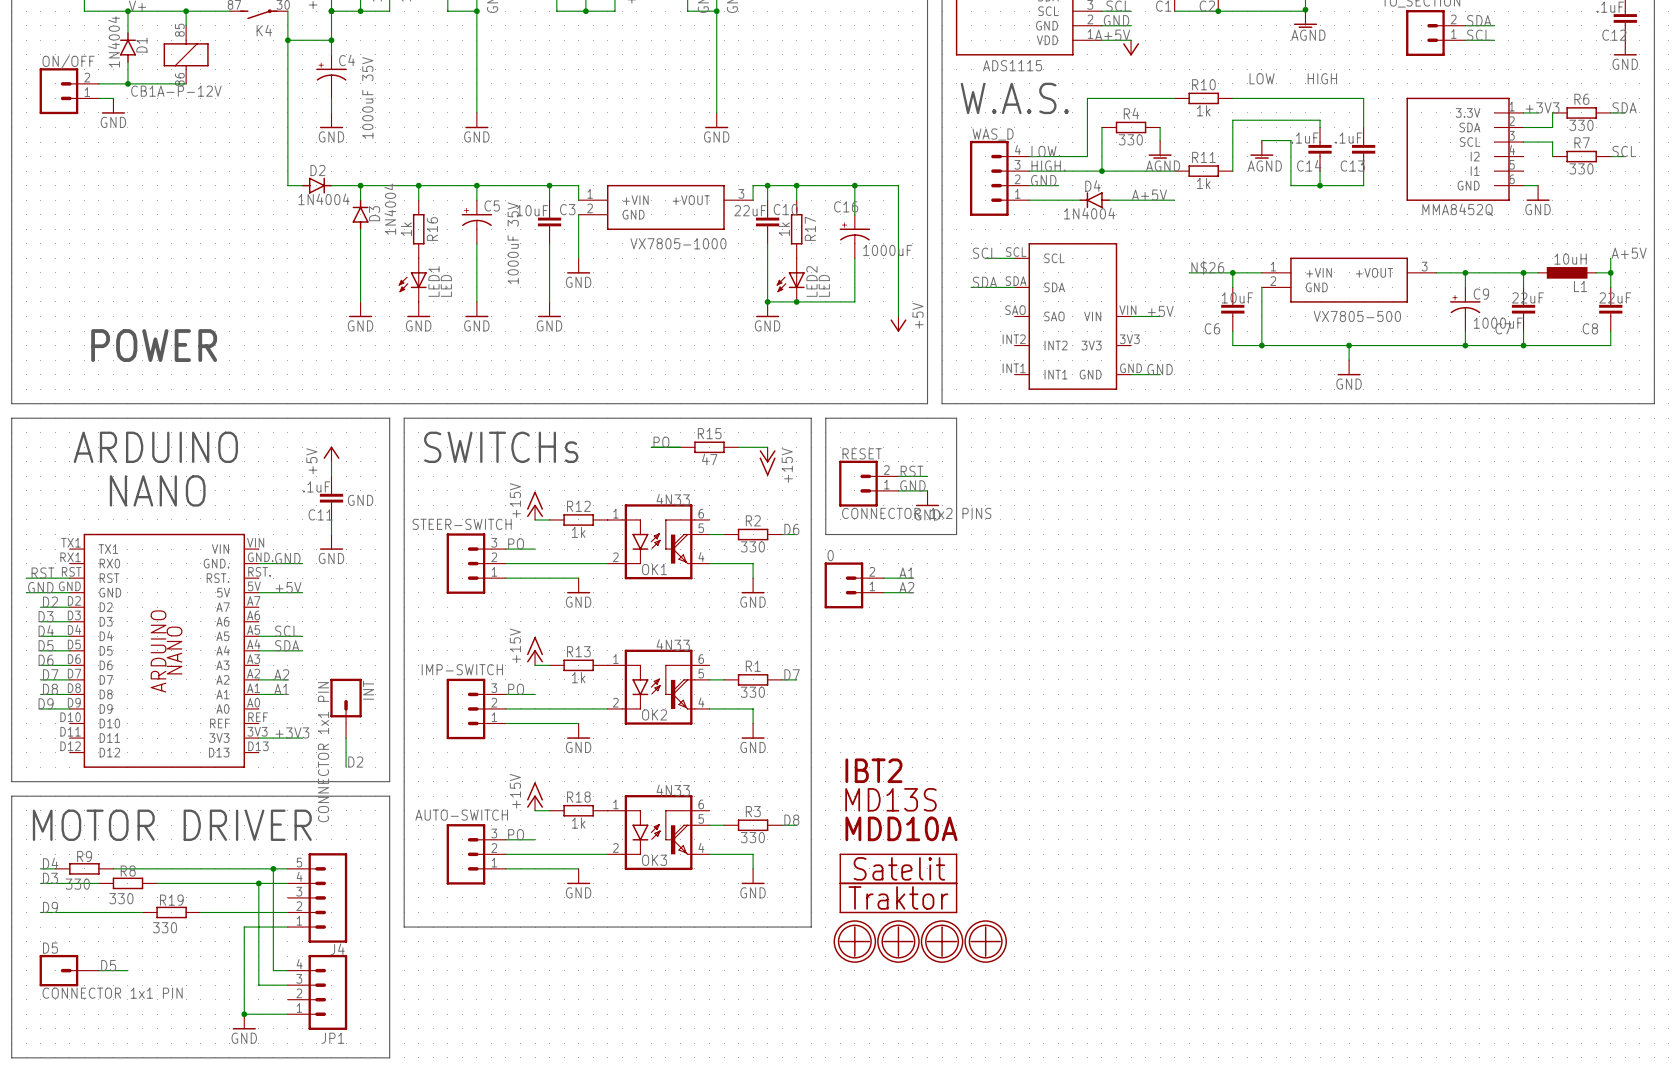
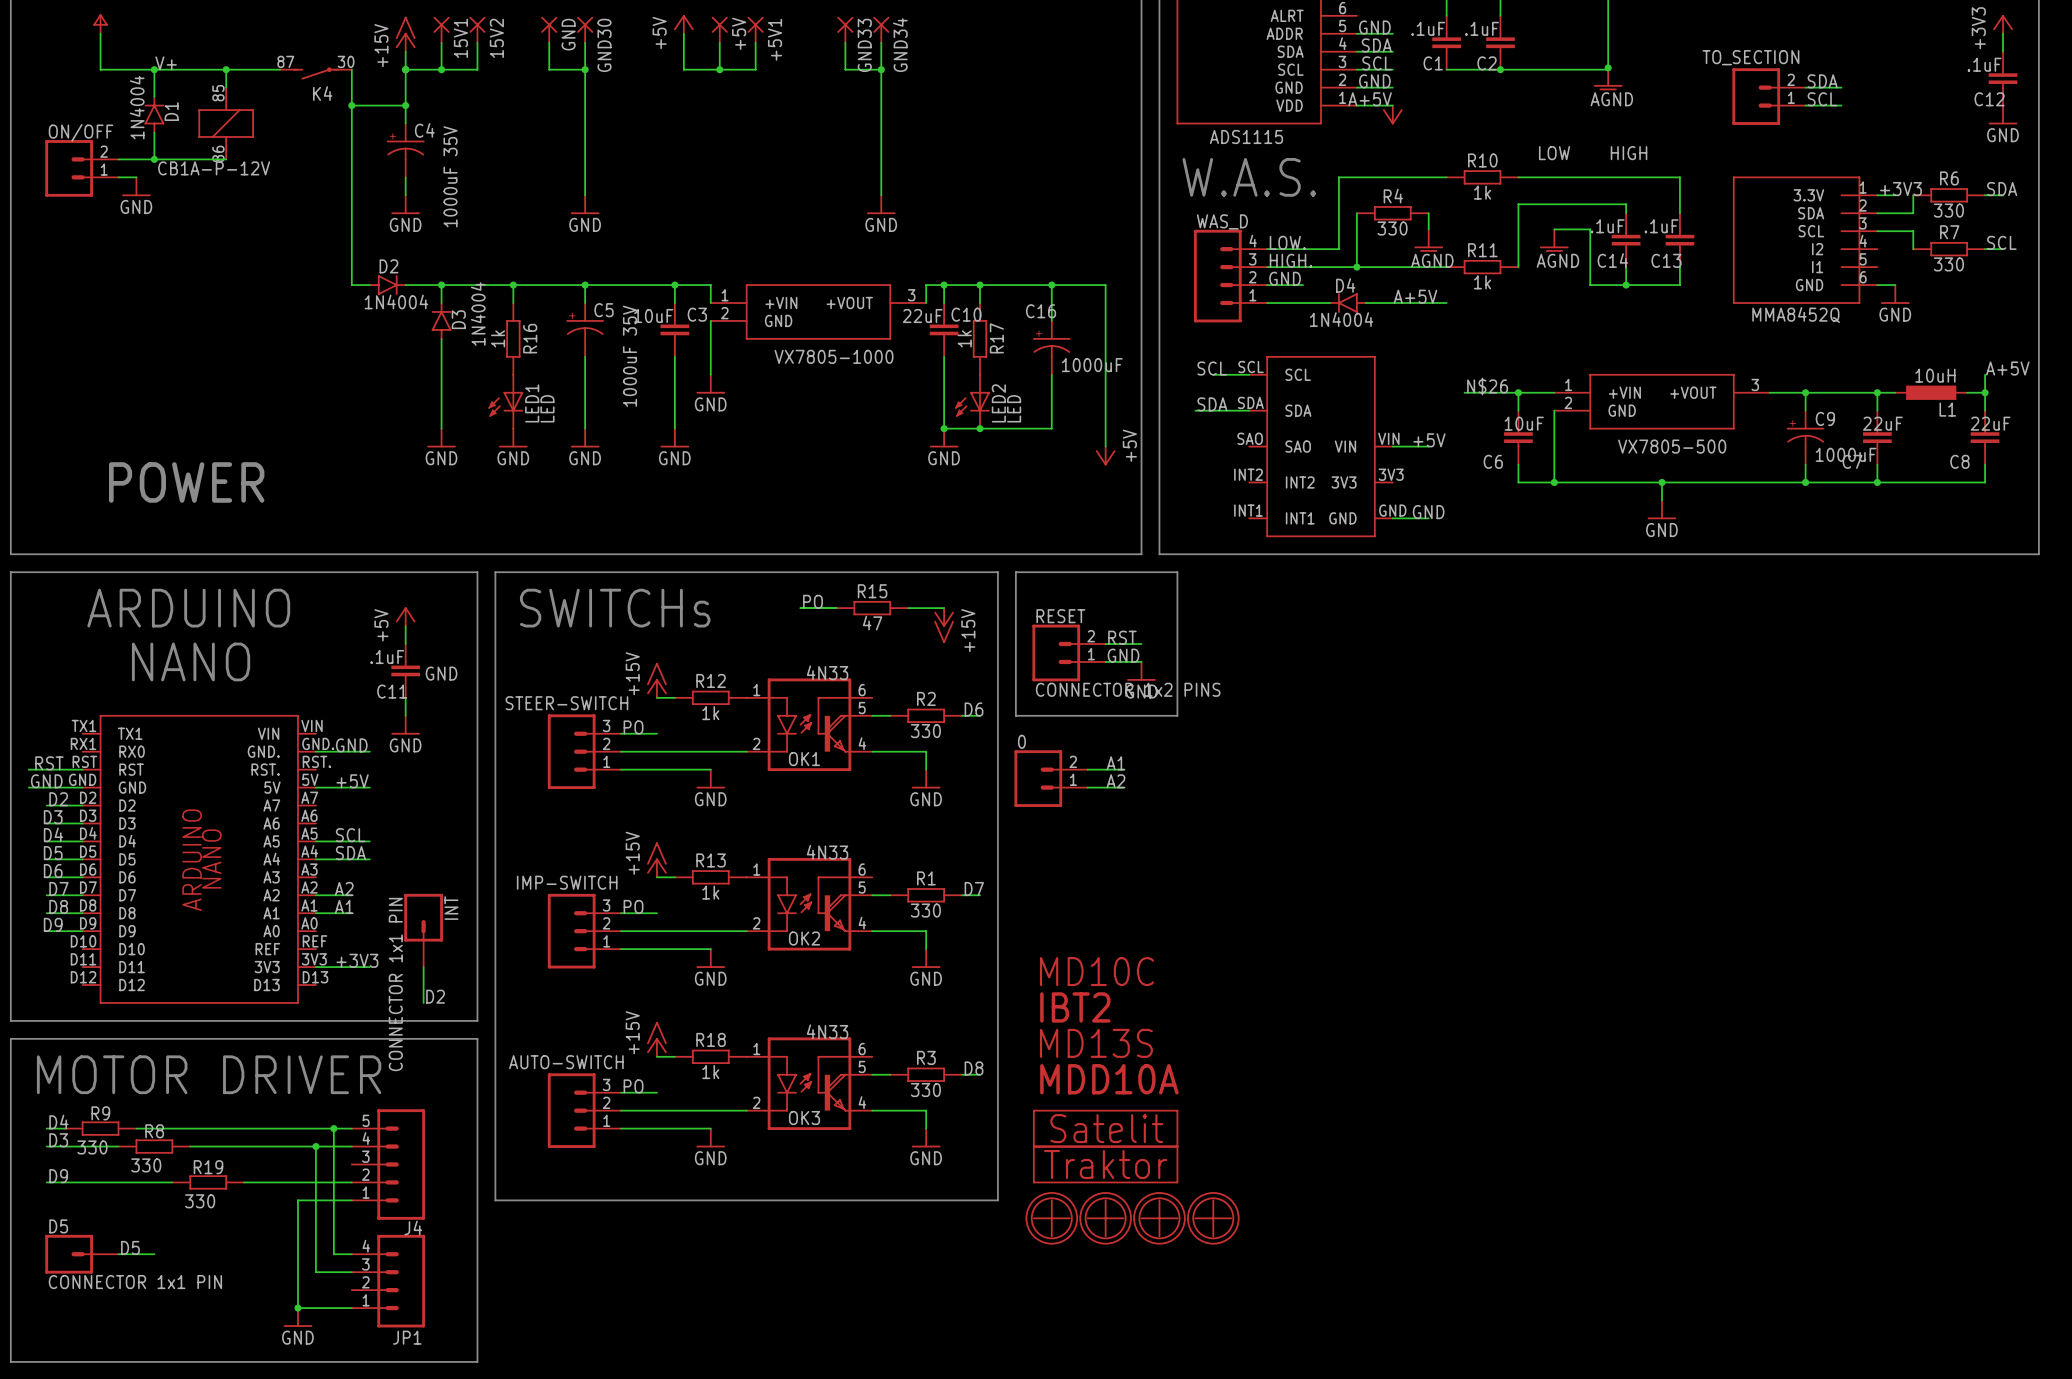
part: none -> (1096, 971)

